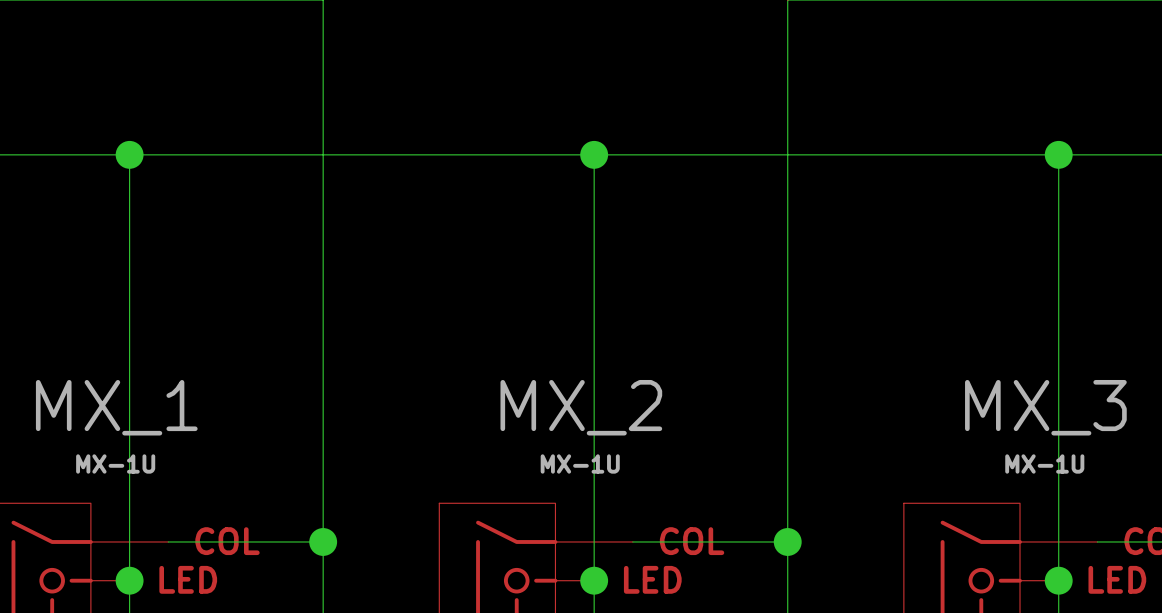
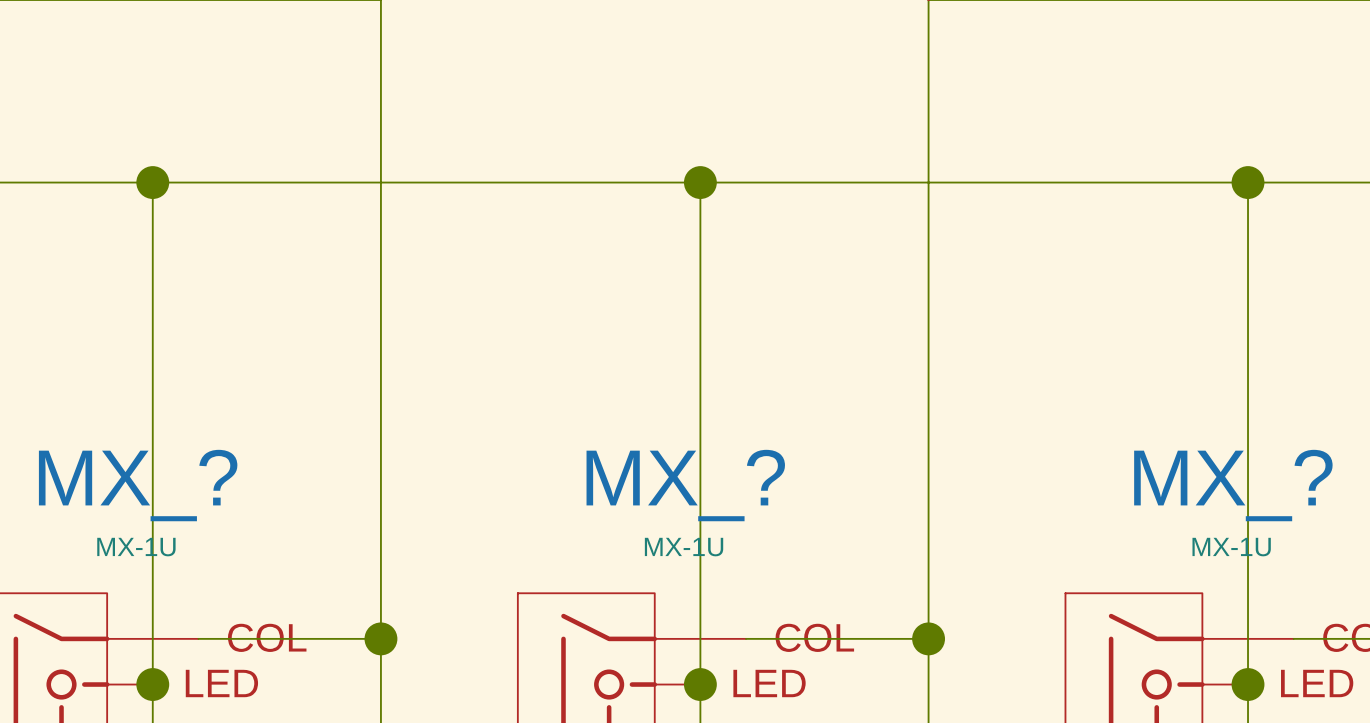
MX_1 name: MX_1 (116, 407) -> MX_? (138, 485)
MX_2 name: MX_2 (581, 407) -> MX_? (685, 485)
MX_3 name: MX_3 (1045, 407) -> MX_? (1233, 485)

